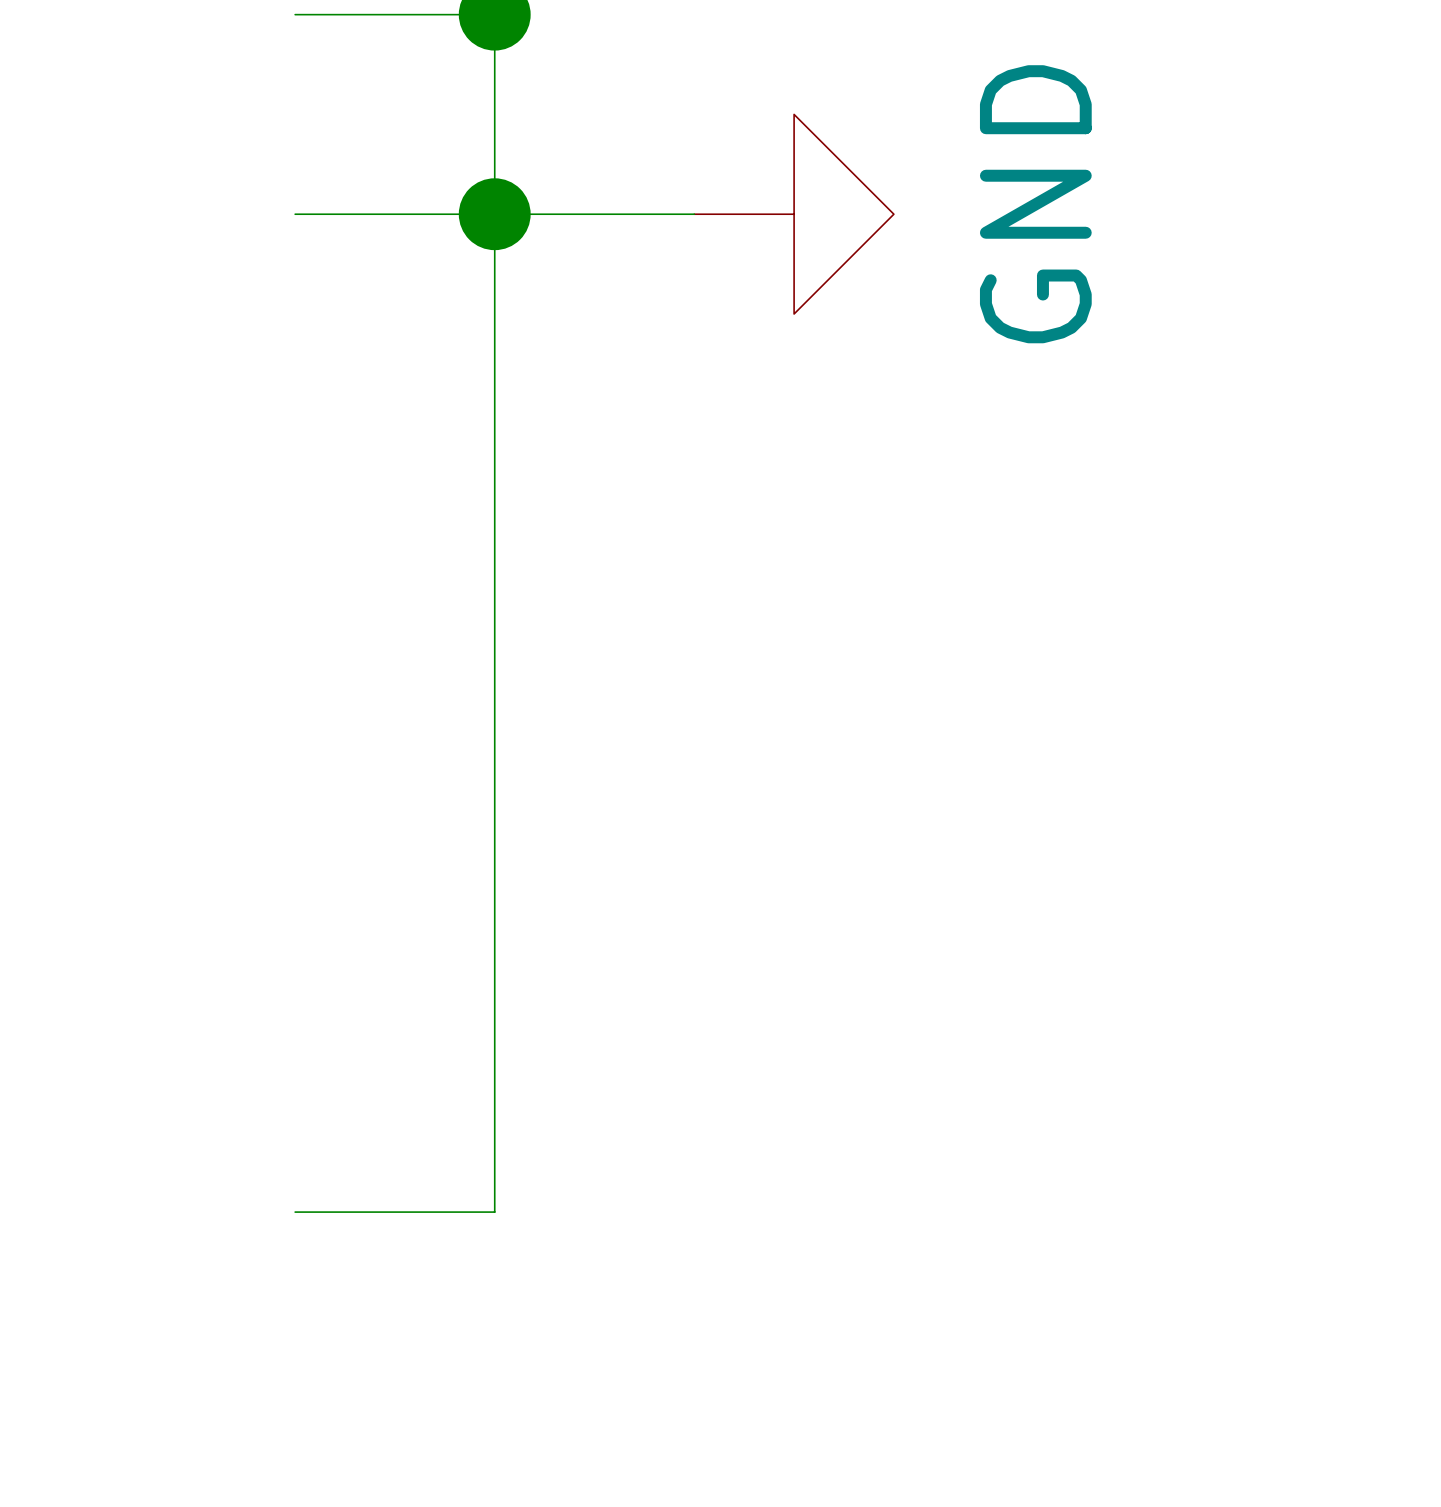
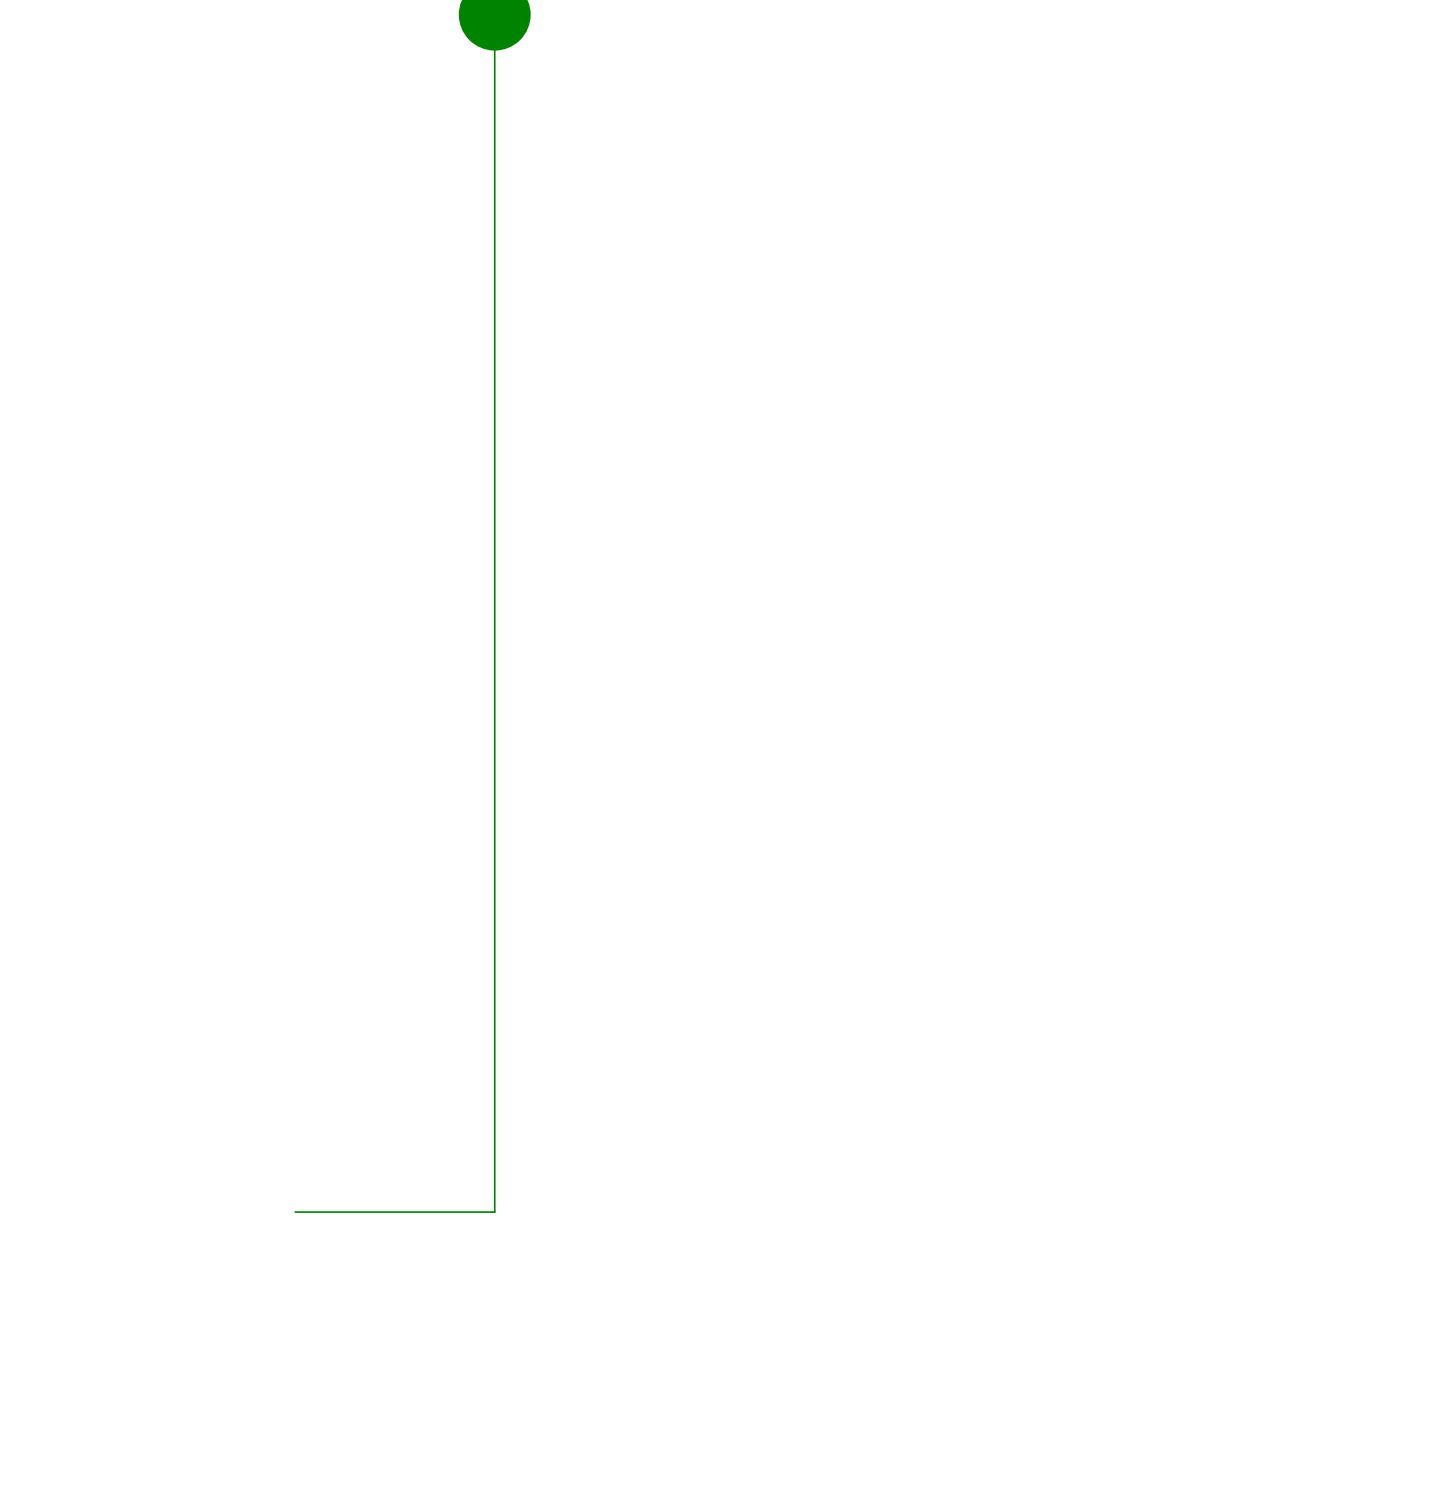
wire: (295, 14) (494, 14) -> none
wire: (295, 214) (694, 214) -> none
junction: (494, 214) -> none
power symbol: GND (794, 214) -> none

